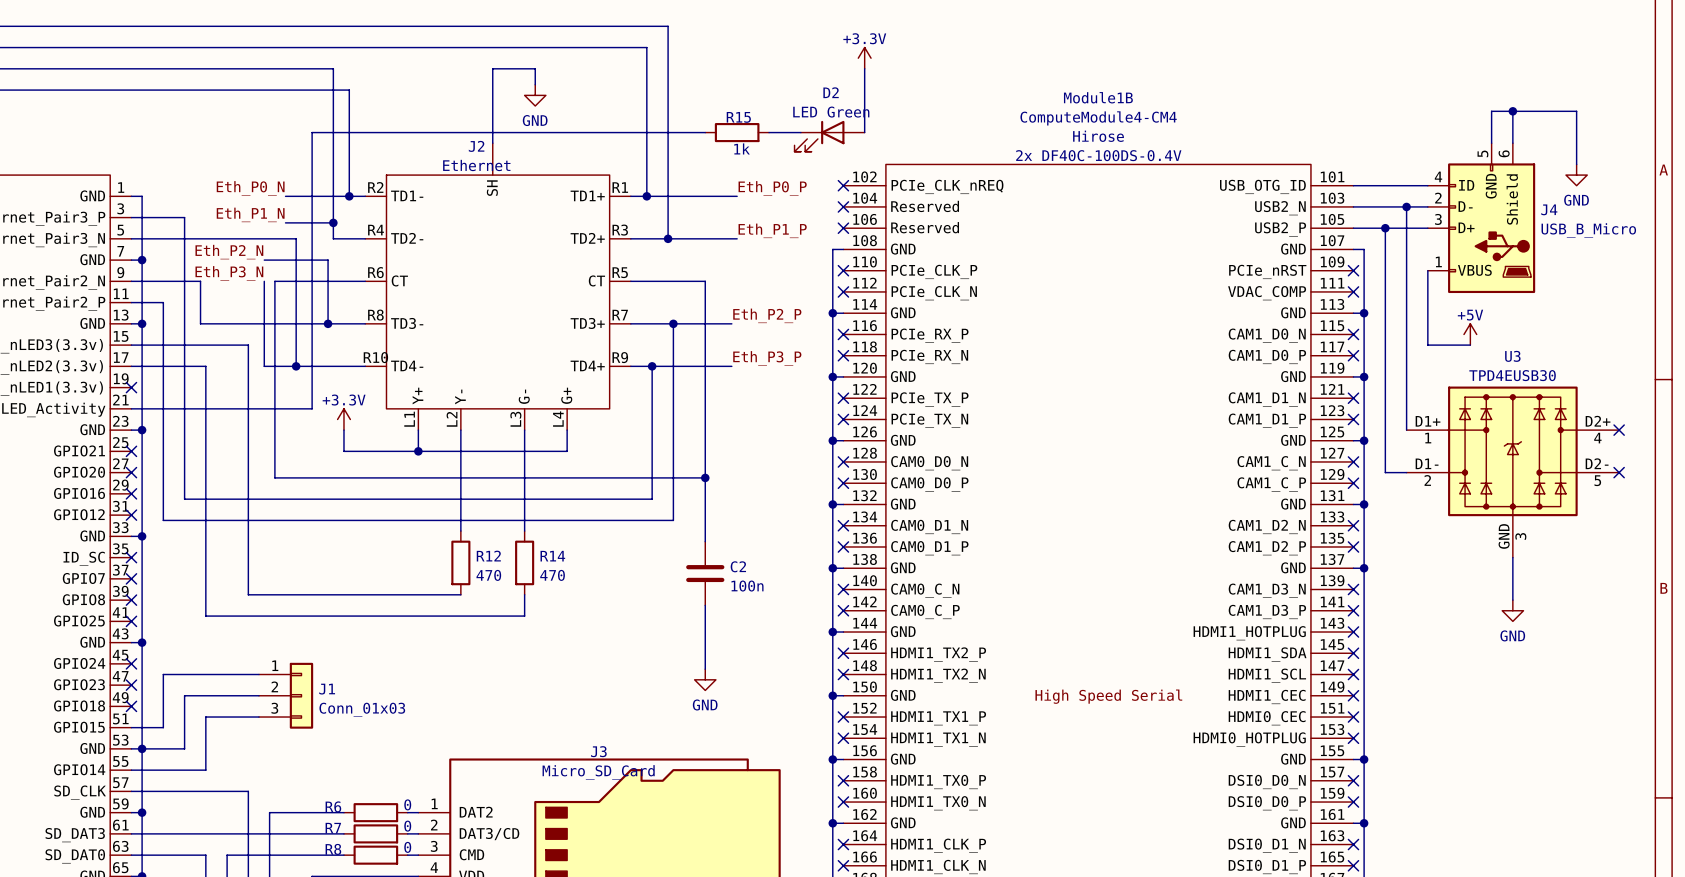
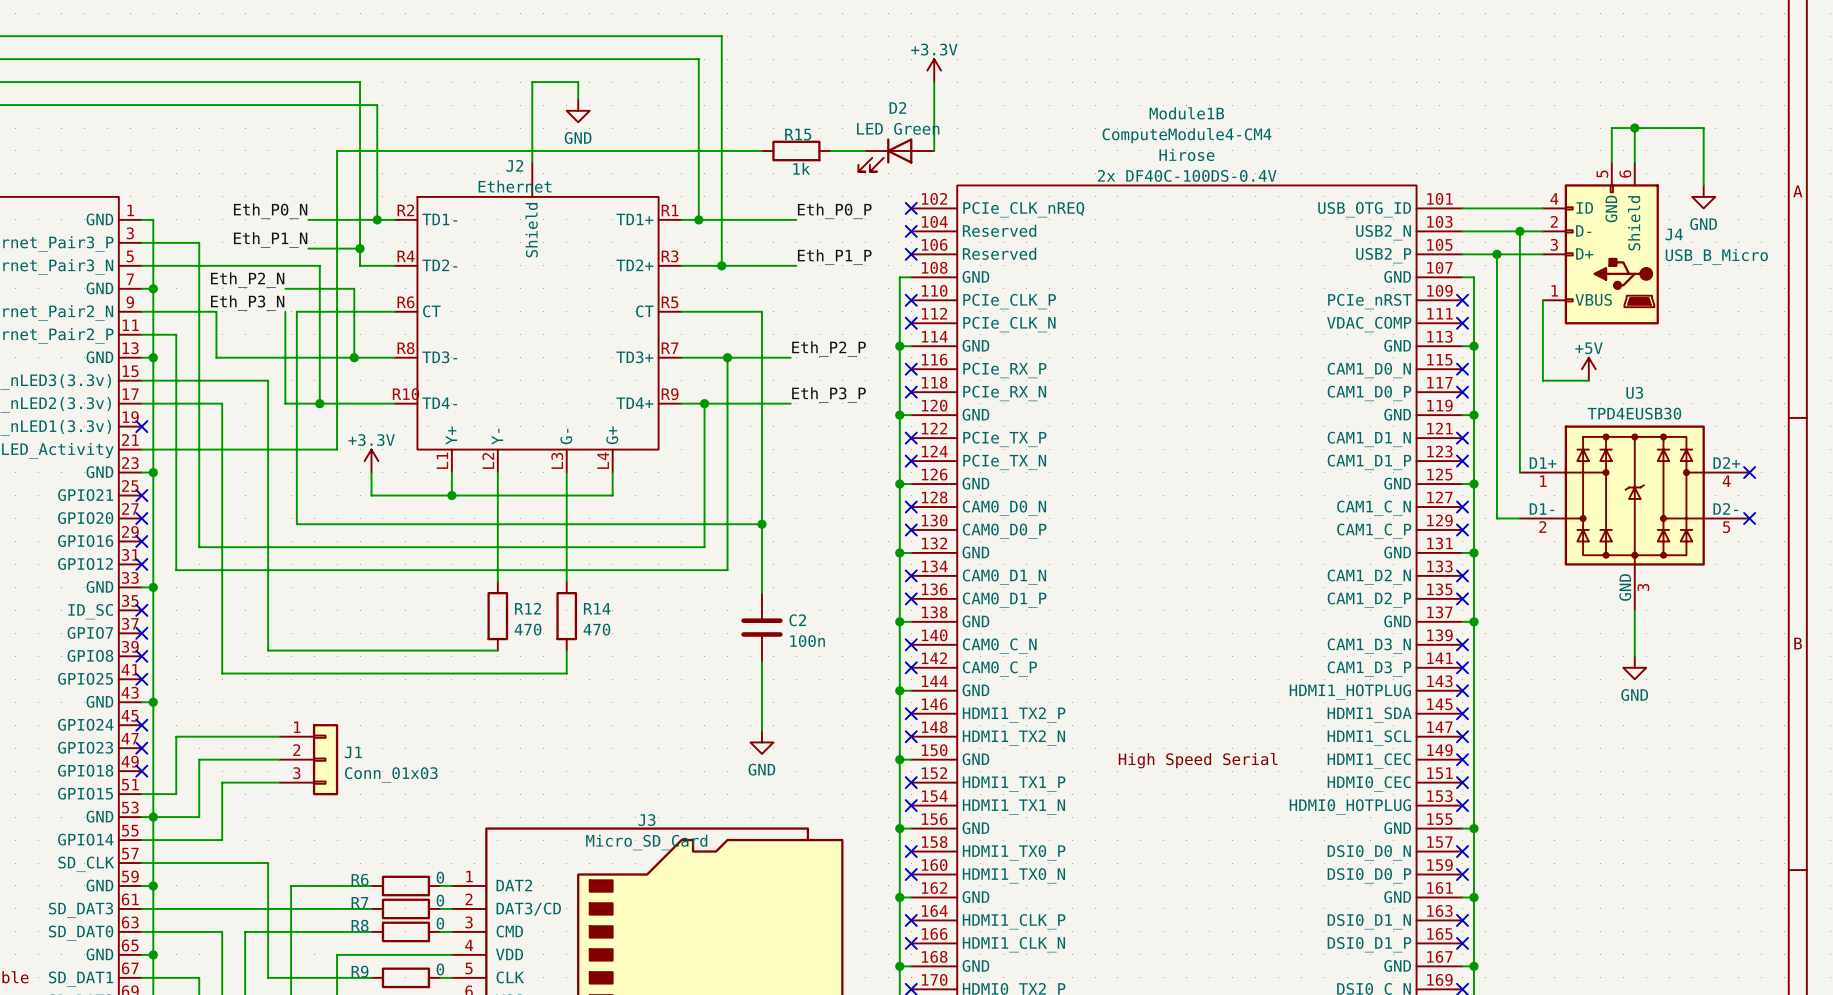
J2 pin name: SH (492, 188) -> Shield (531, 230)

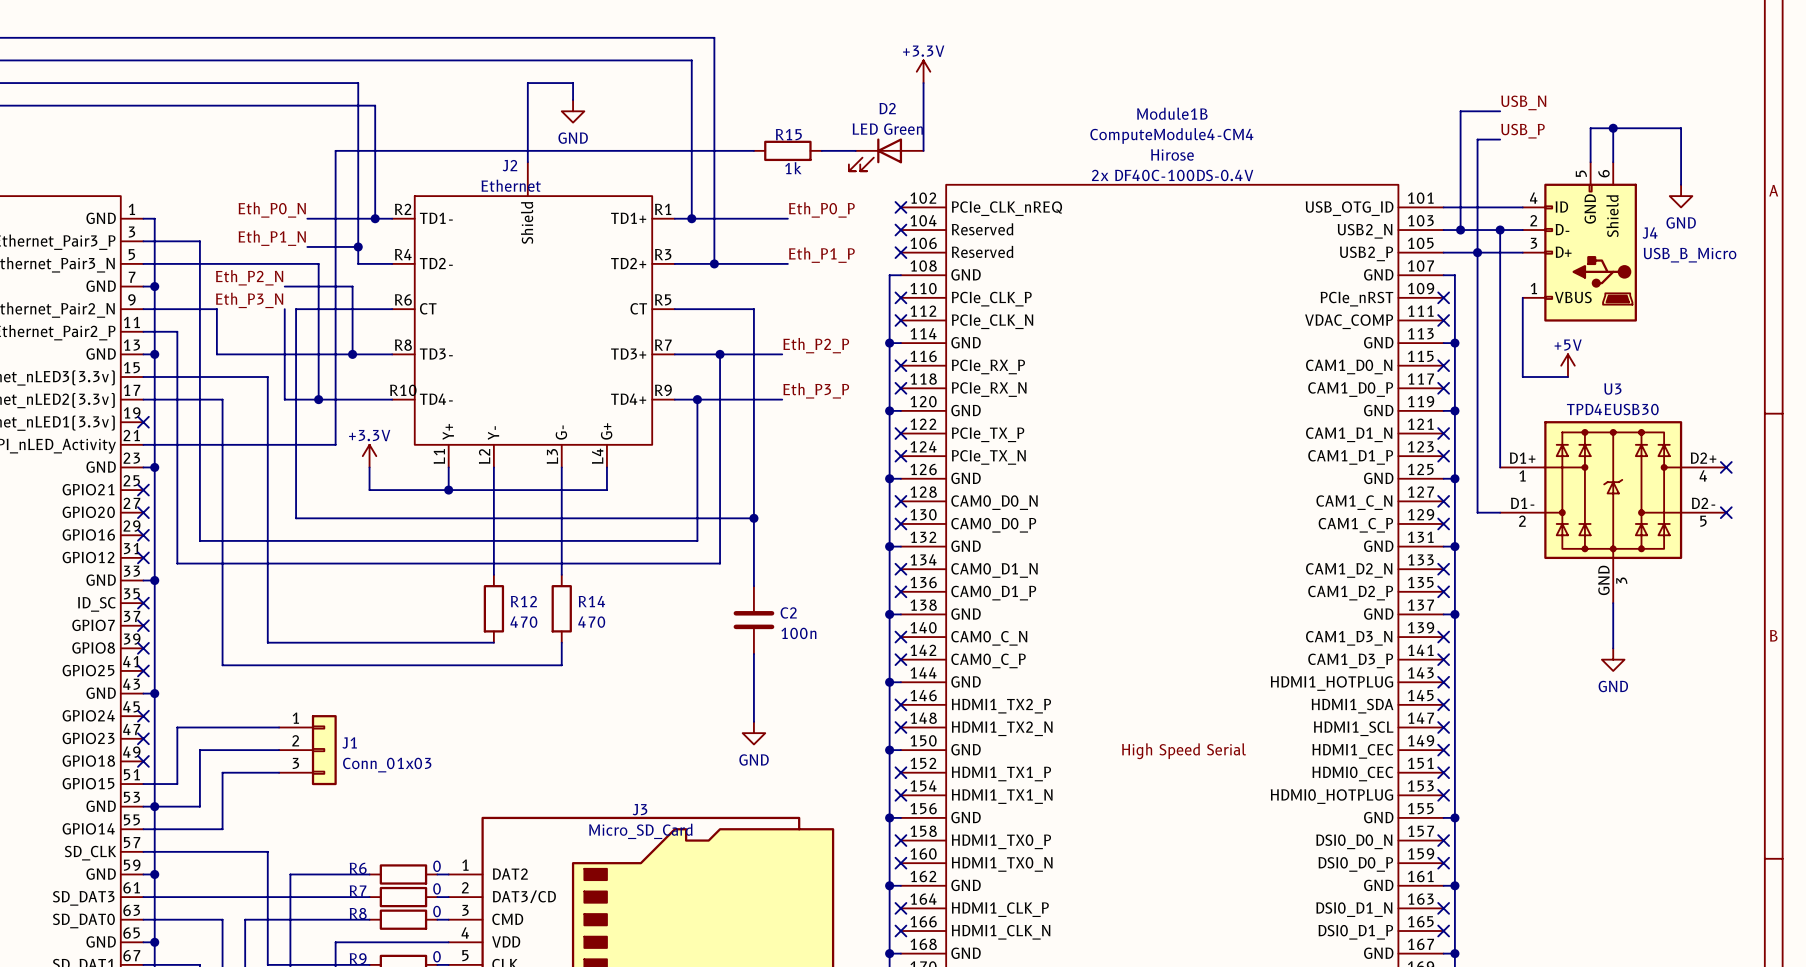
label: none -> USB_N (1523, 102)
wire: none -> (1500, 111) (1460, 111) (1460, 230)
label: none -> USB_P (1523, 131)
wire: none -> (1500, 139) (1477, 139) (1477, 252)
junction: none -> (1460, 230)

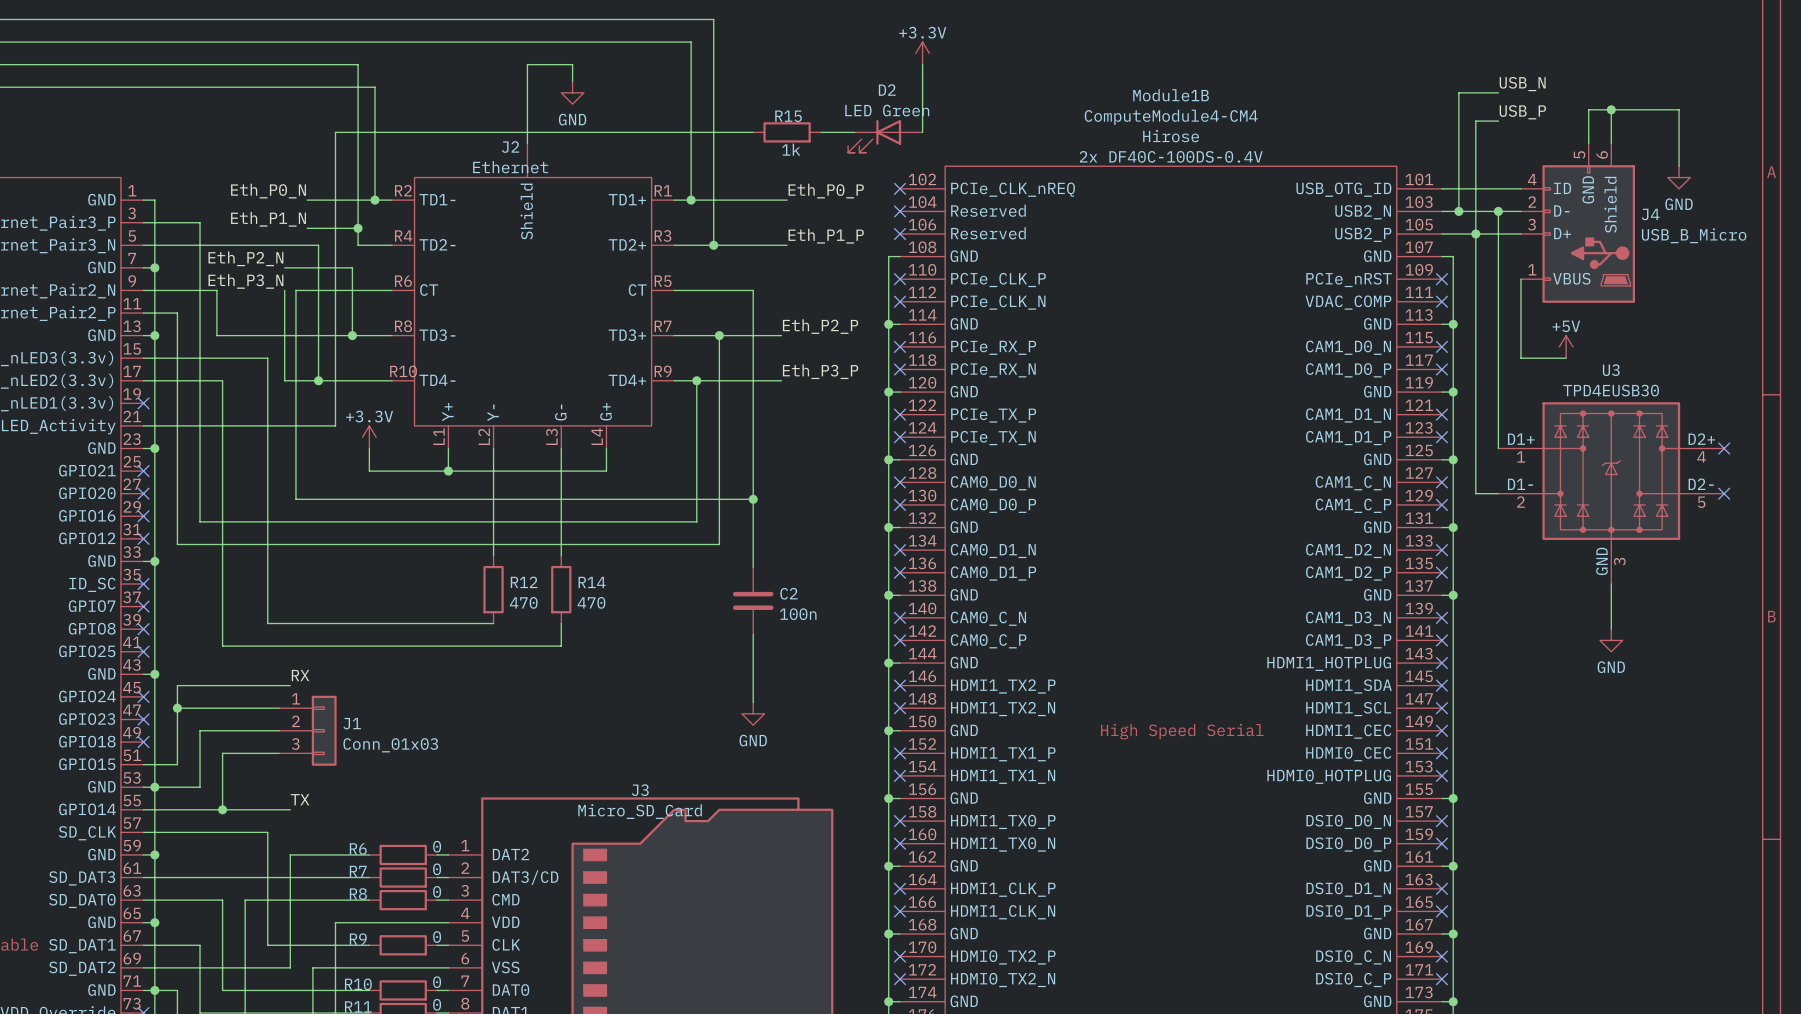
label: none -> RX (300, 675)
wire: none -> (290, 685) (177, 685) (177, 708)
junction: none -> (177, 708)
label: none -> TX (300, 799)
wire: none -> (222, 809) (290, 809)
junction: none -> (222, 809)

